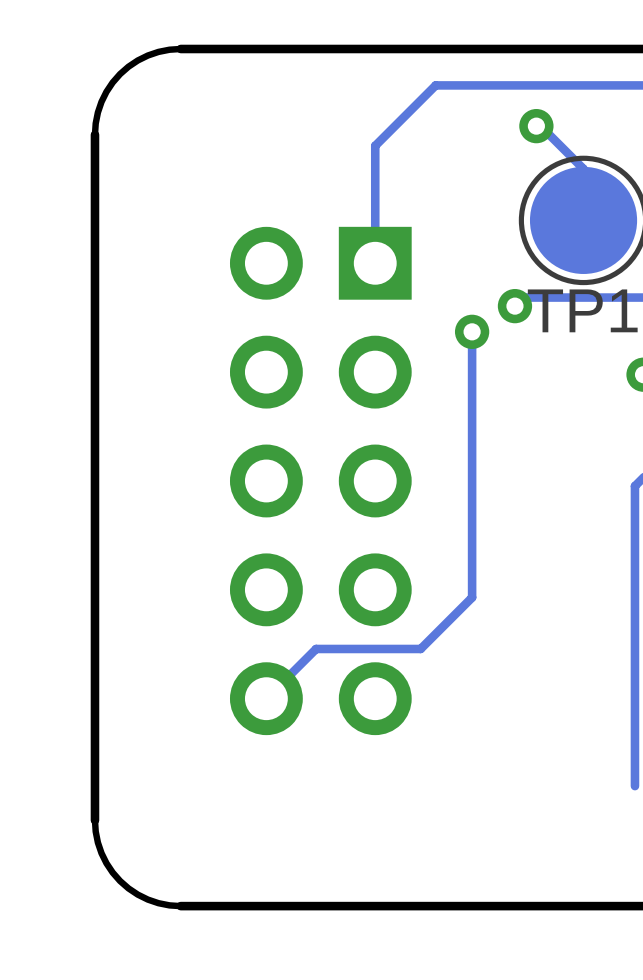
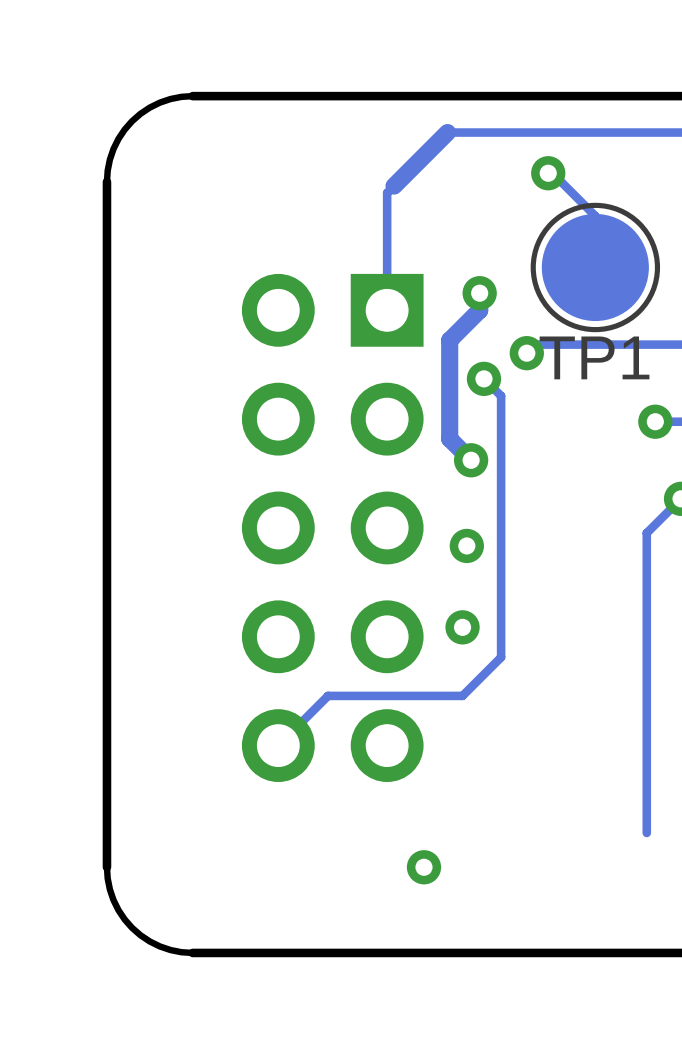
track width: thin (435, 85) (382, 138) -> thick (447, 132) (394, 186)
track: none -> (479, 293) (479, 310) (449, 340) (449, 438) (471, 460)
via: none -> (479, 293)
track: (472, 331) (472, 597) (420, 648) -> (483, 378) (501, 396) (501, 657) (462, 695) (432, 695)
via: none -> (471, 460)
via: none -> (466, 545)
via: none -> (462, 627)
via: none -> (423, 867)

